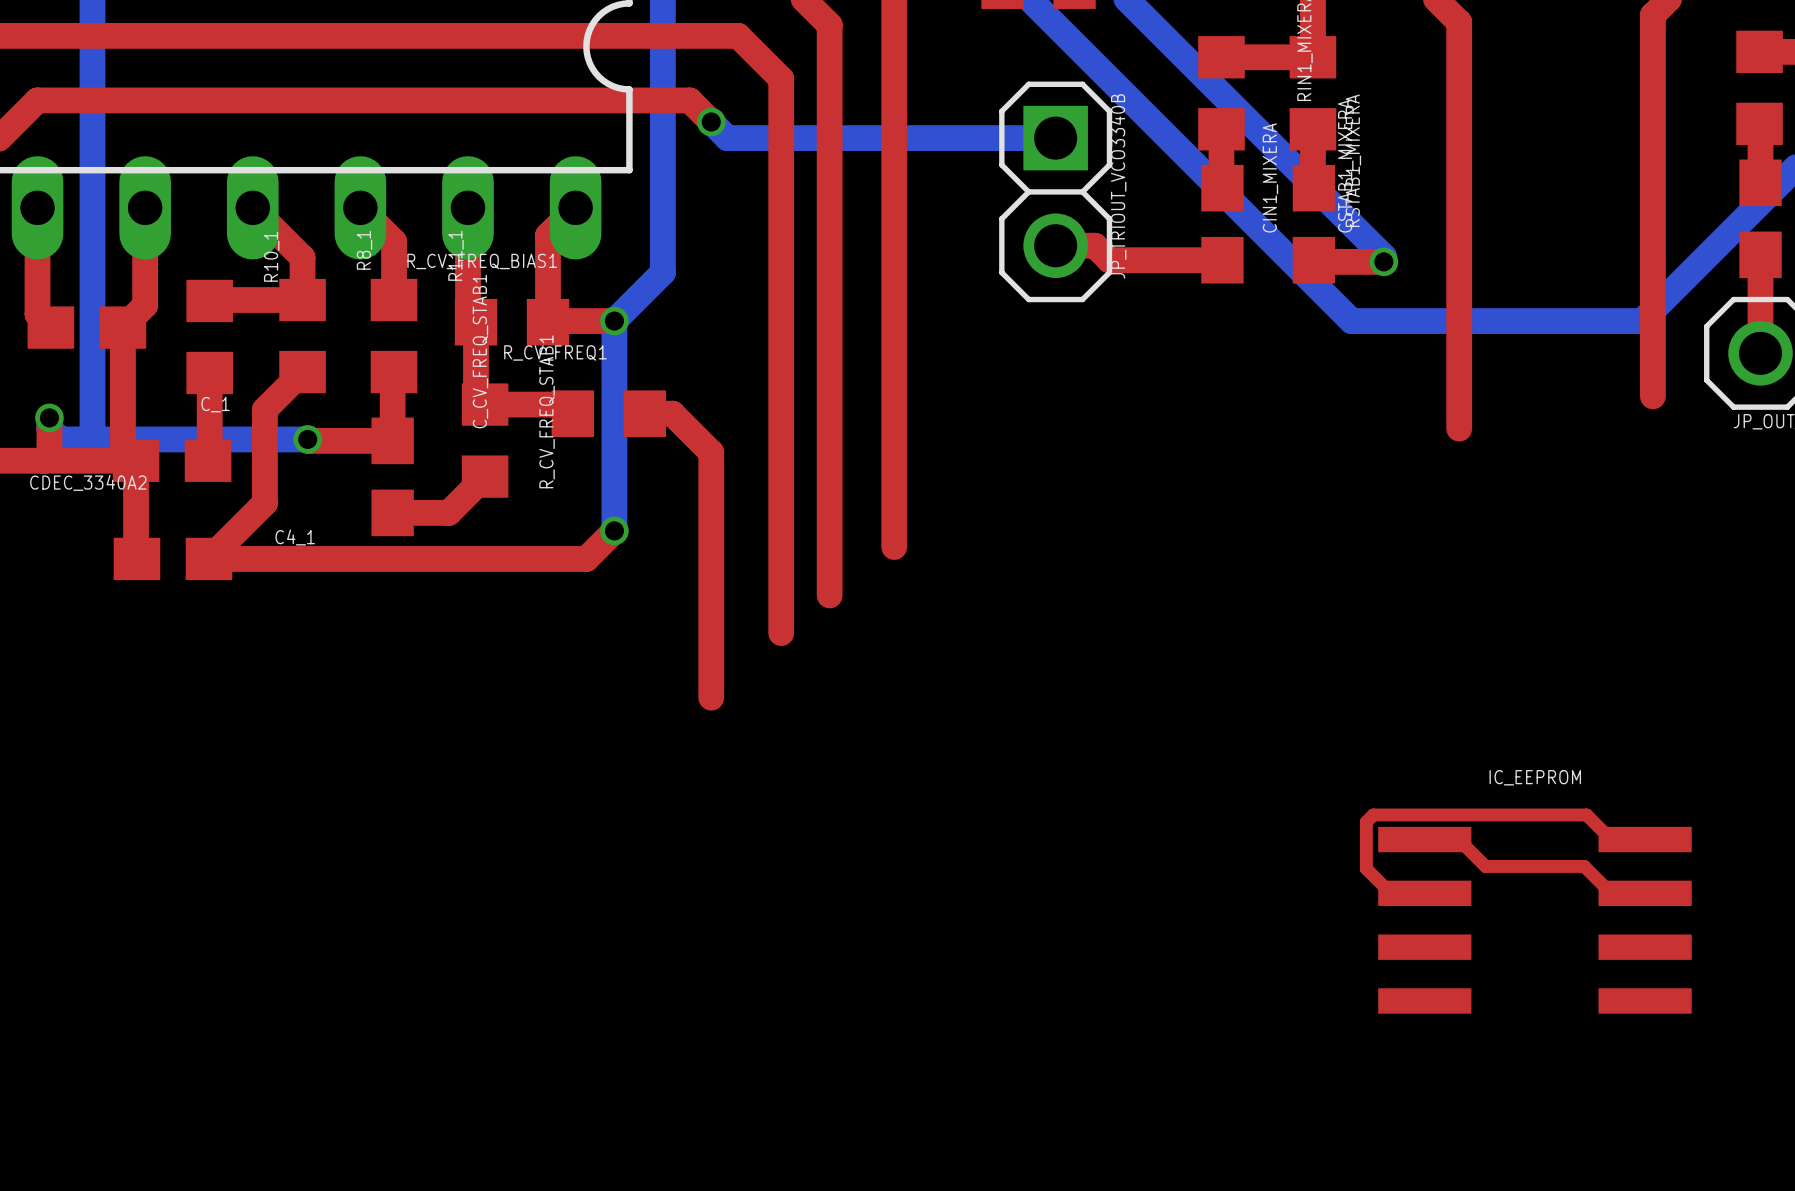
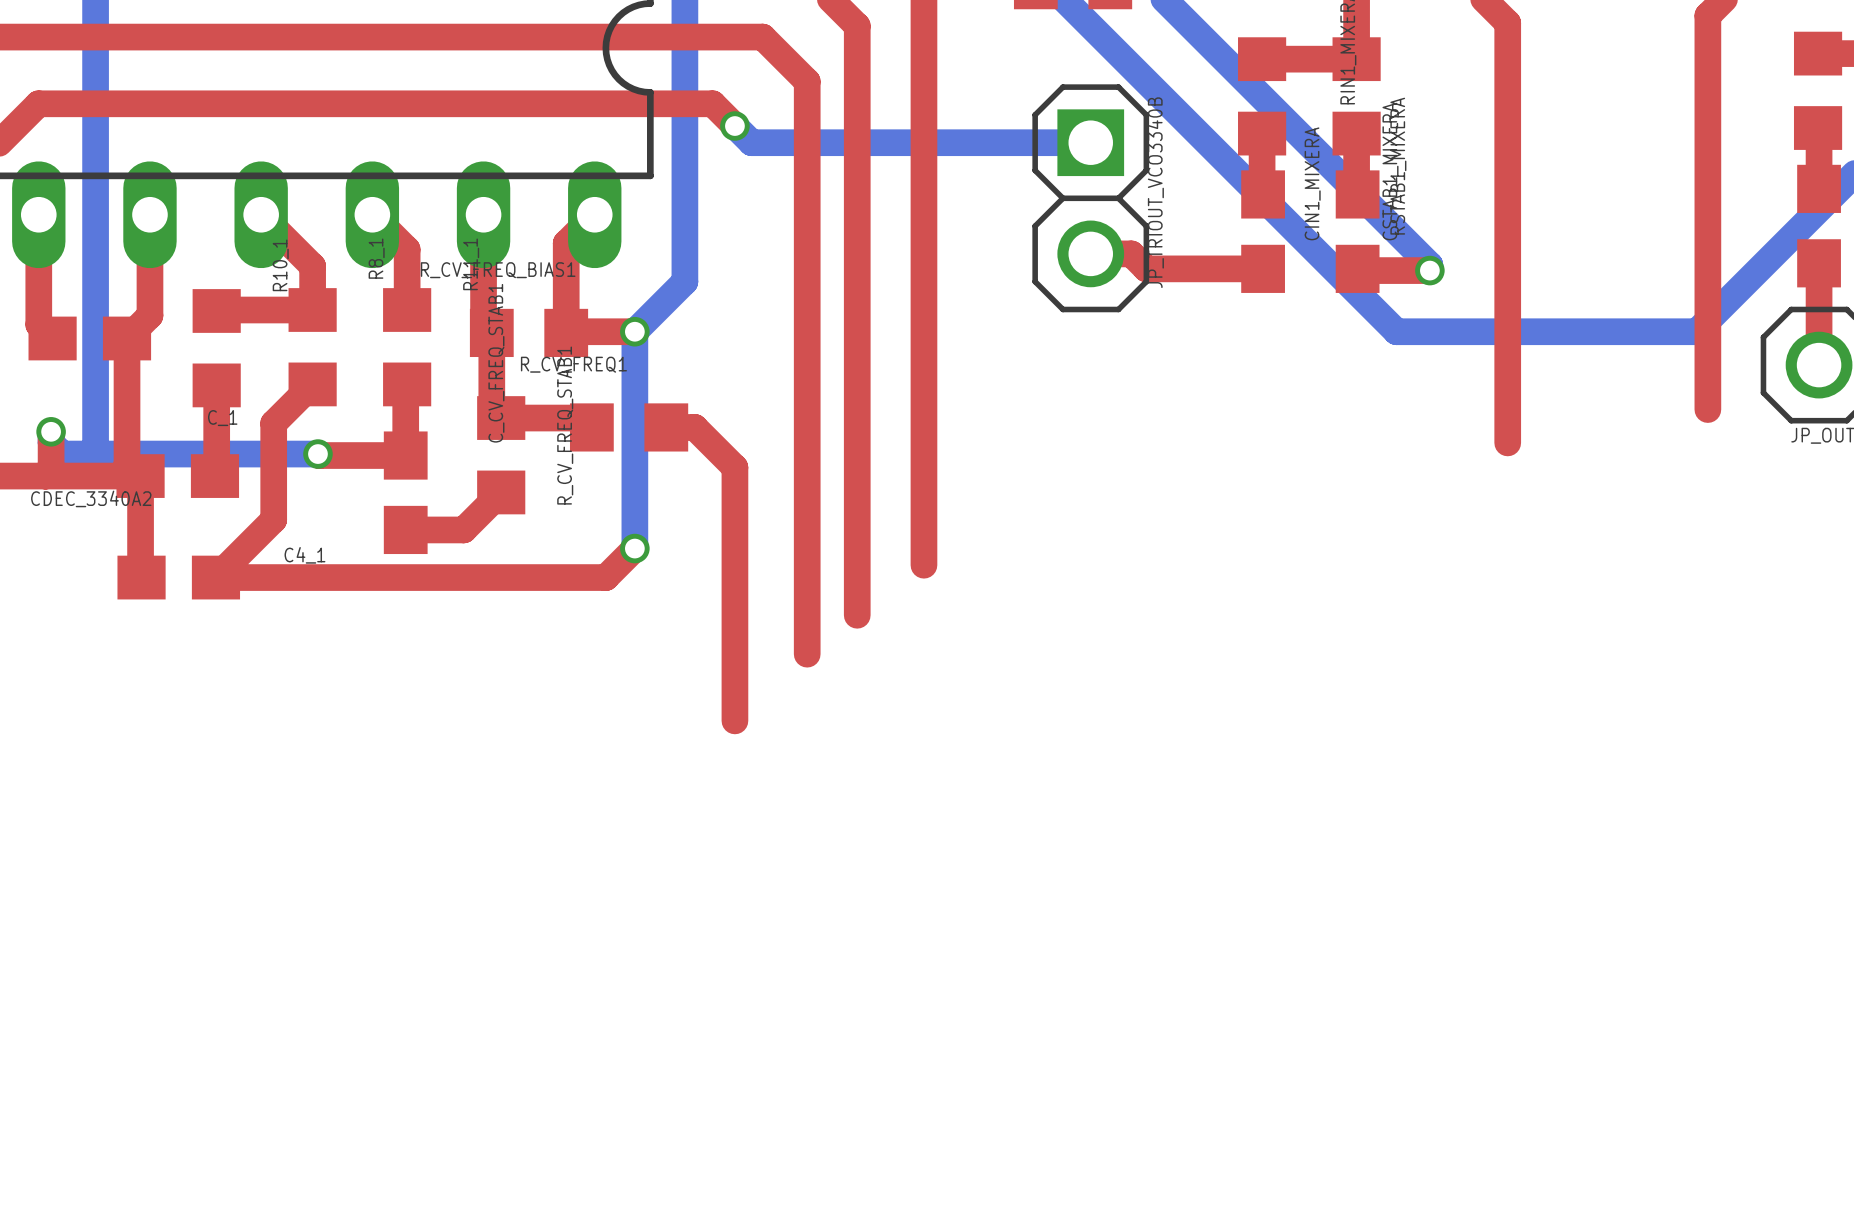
top track: (1424, 839) (1458, 839) (1485, 866) (1584, 866) (1611, 893) (1645, 893) -> none
top track: (1645, 839) (1611, 839) (1586, 815) (1373, 815) (1366, 821) (1366, 868) (1390, 893) (1424, 893) -> none
IC_EEPROM: (1534, 920) -> none

